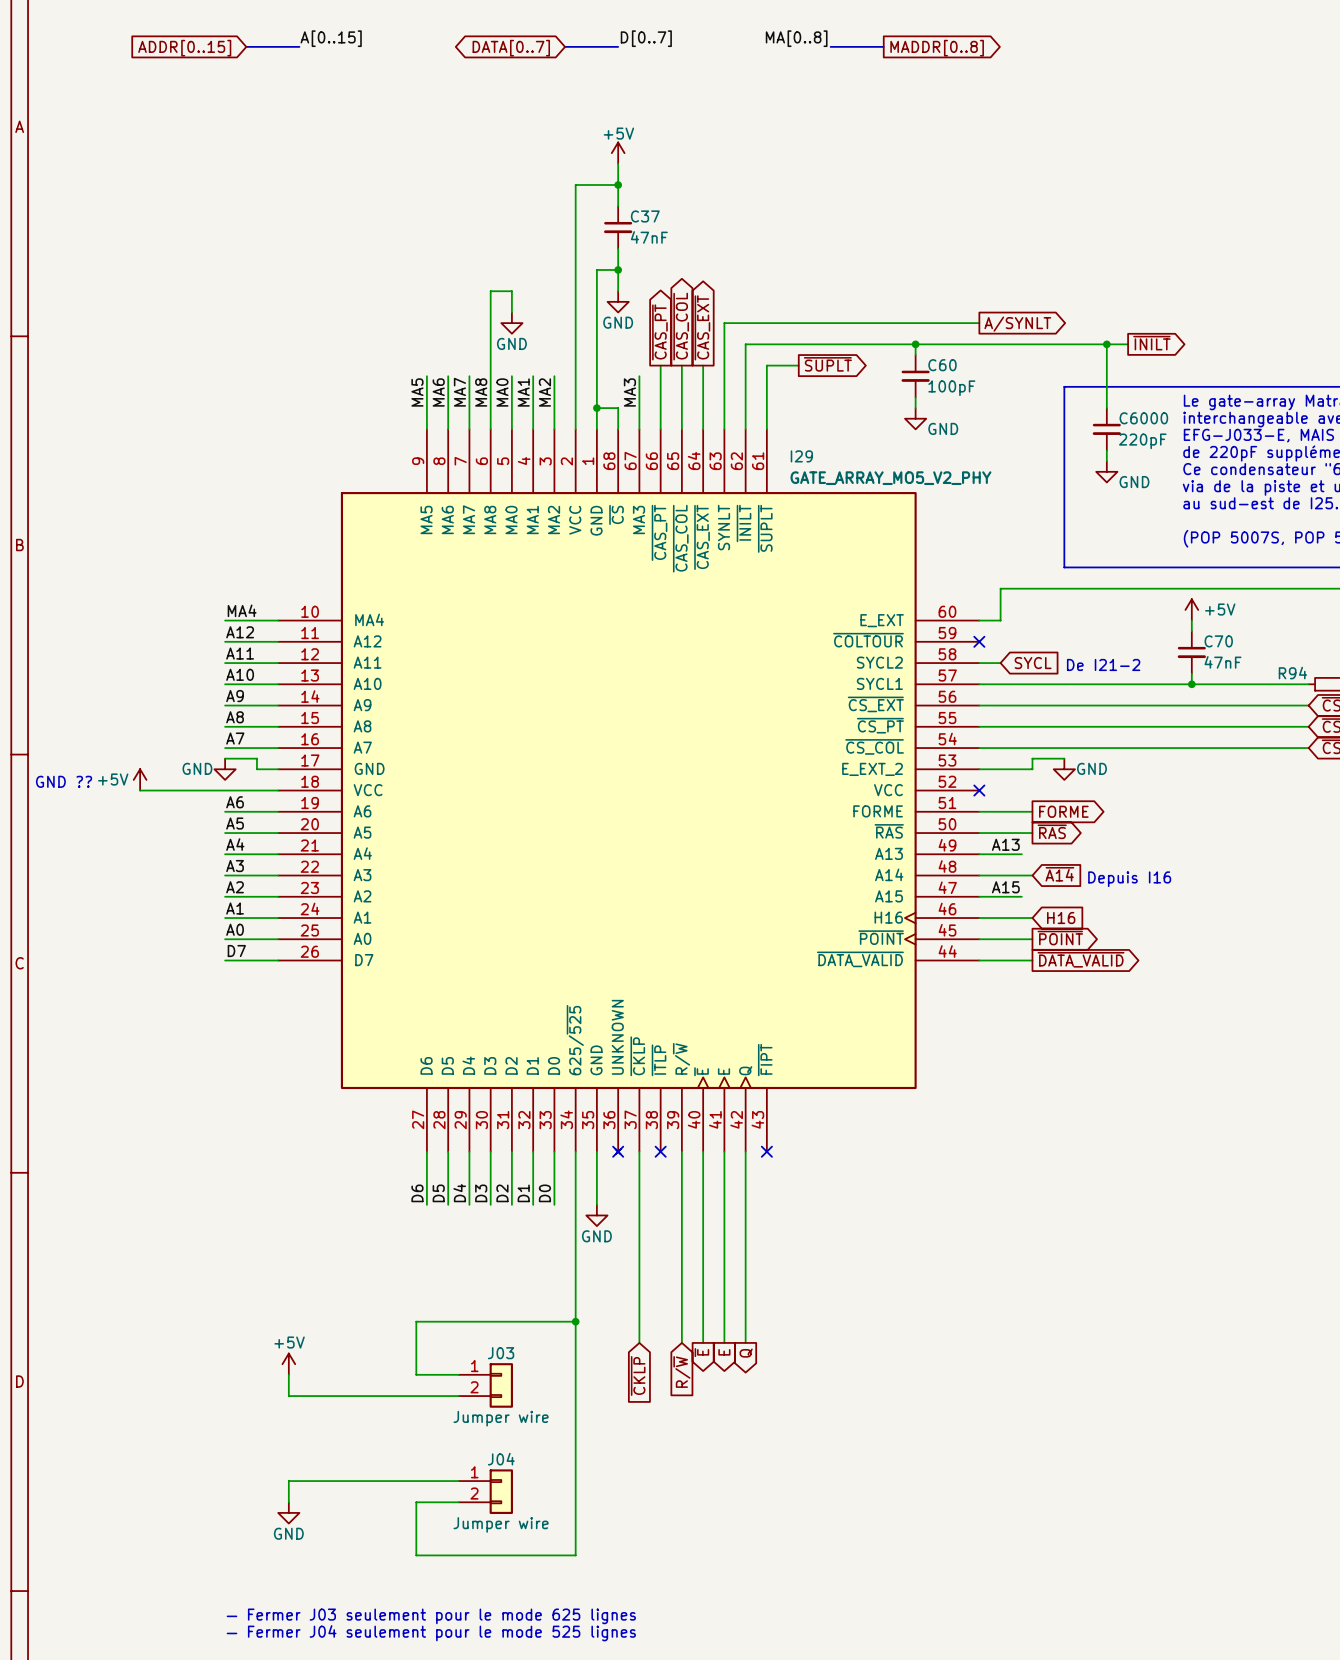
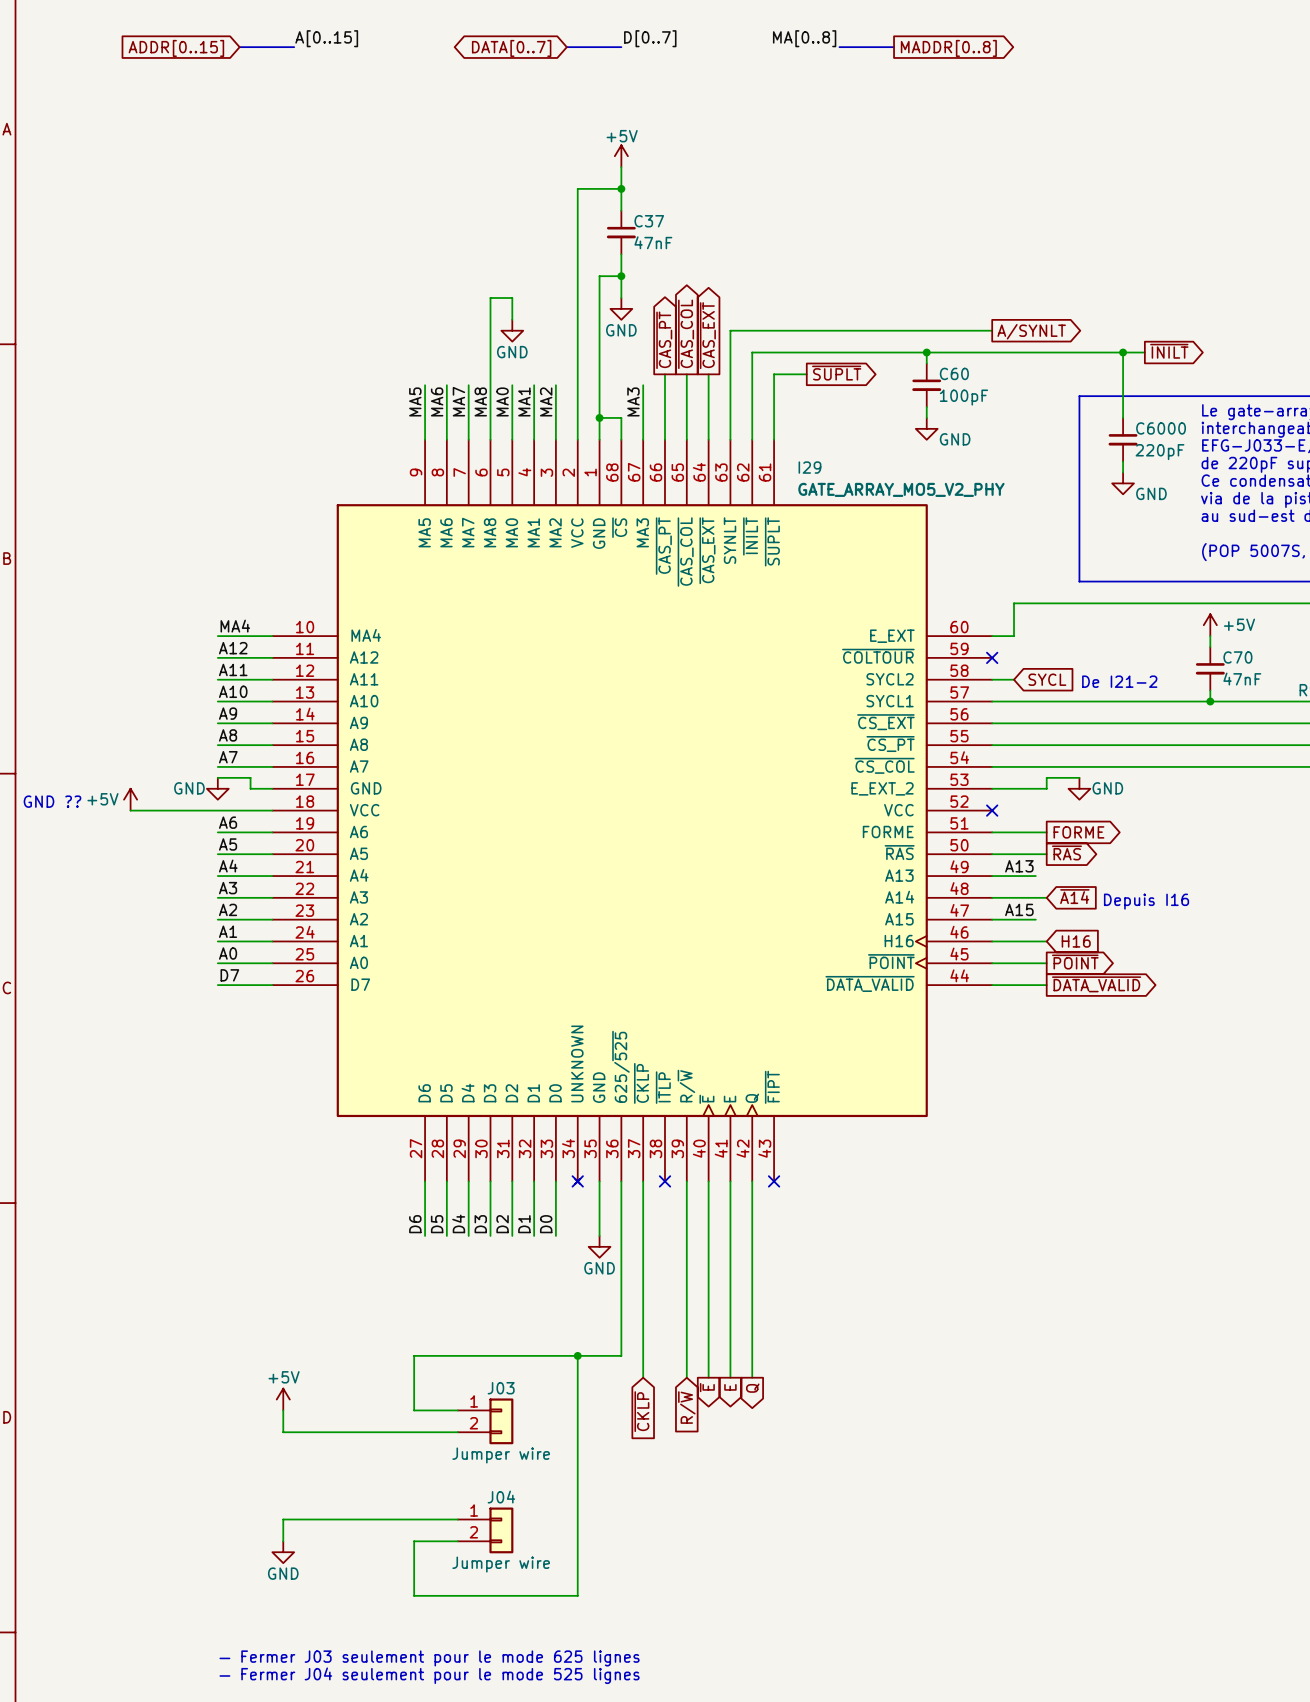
I29 symbol: [278, 429, 980, 1155] -> [272, 439, 993, 1184]
wire: (575, 1151) (575, 1321) -> (621, 1181) (621, 1355) (577, 1355)
no-connect mark position: (618, 1151) -> (577, 1181)

